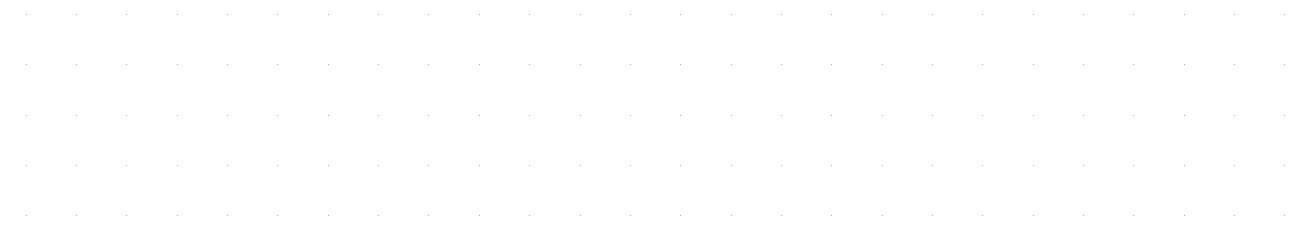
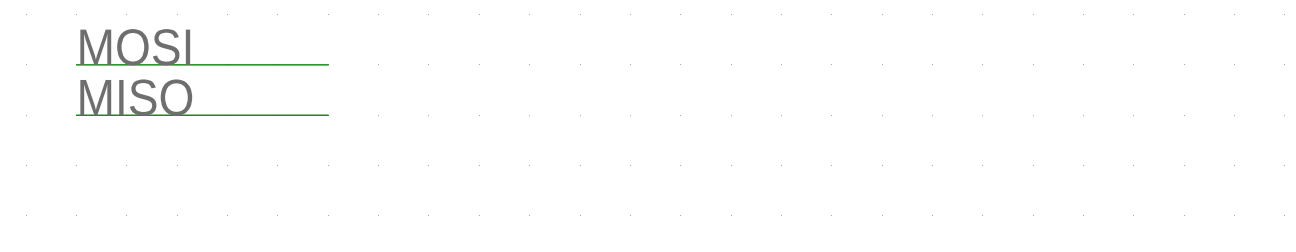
label: none -> MOSI (135, 47)
wire: none -> (76, 64) (328, 64)
label: none -> MISO (136, 97)
wire: none -> (76, 115) (328, 115)

